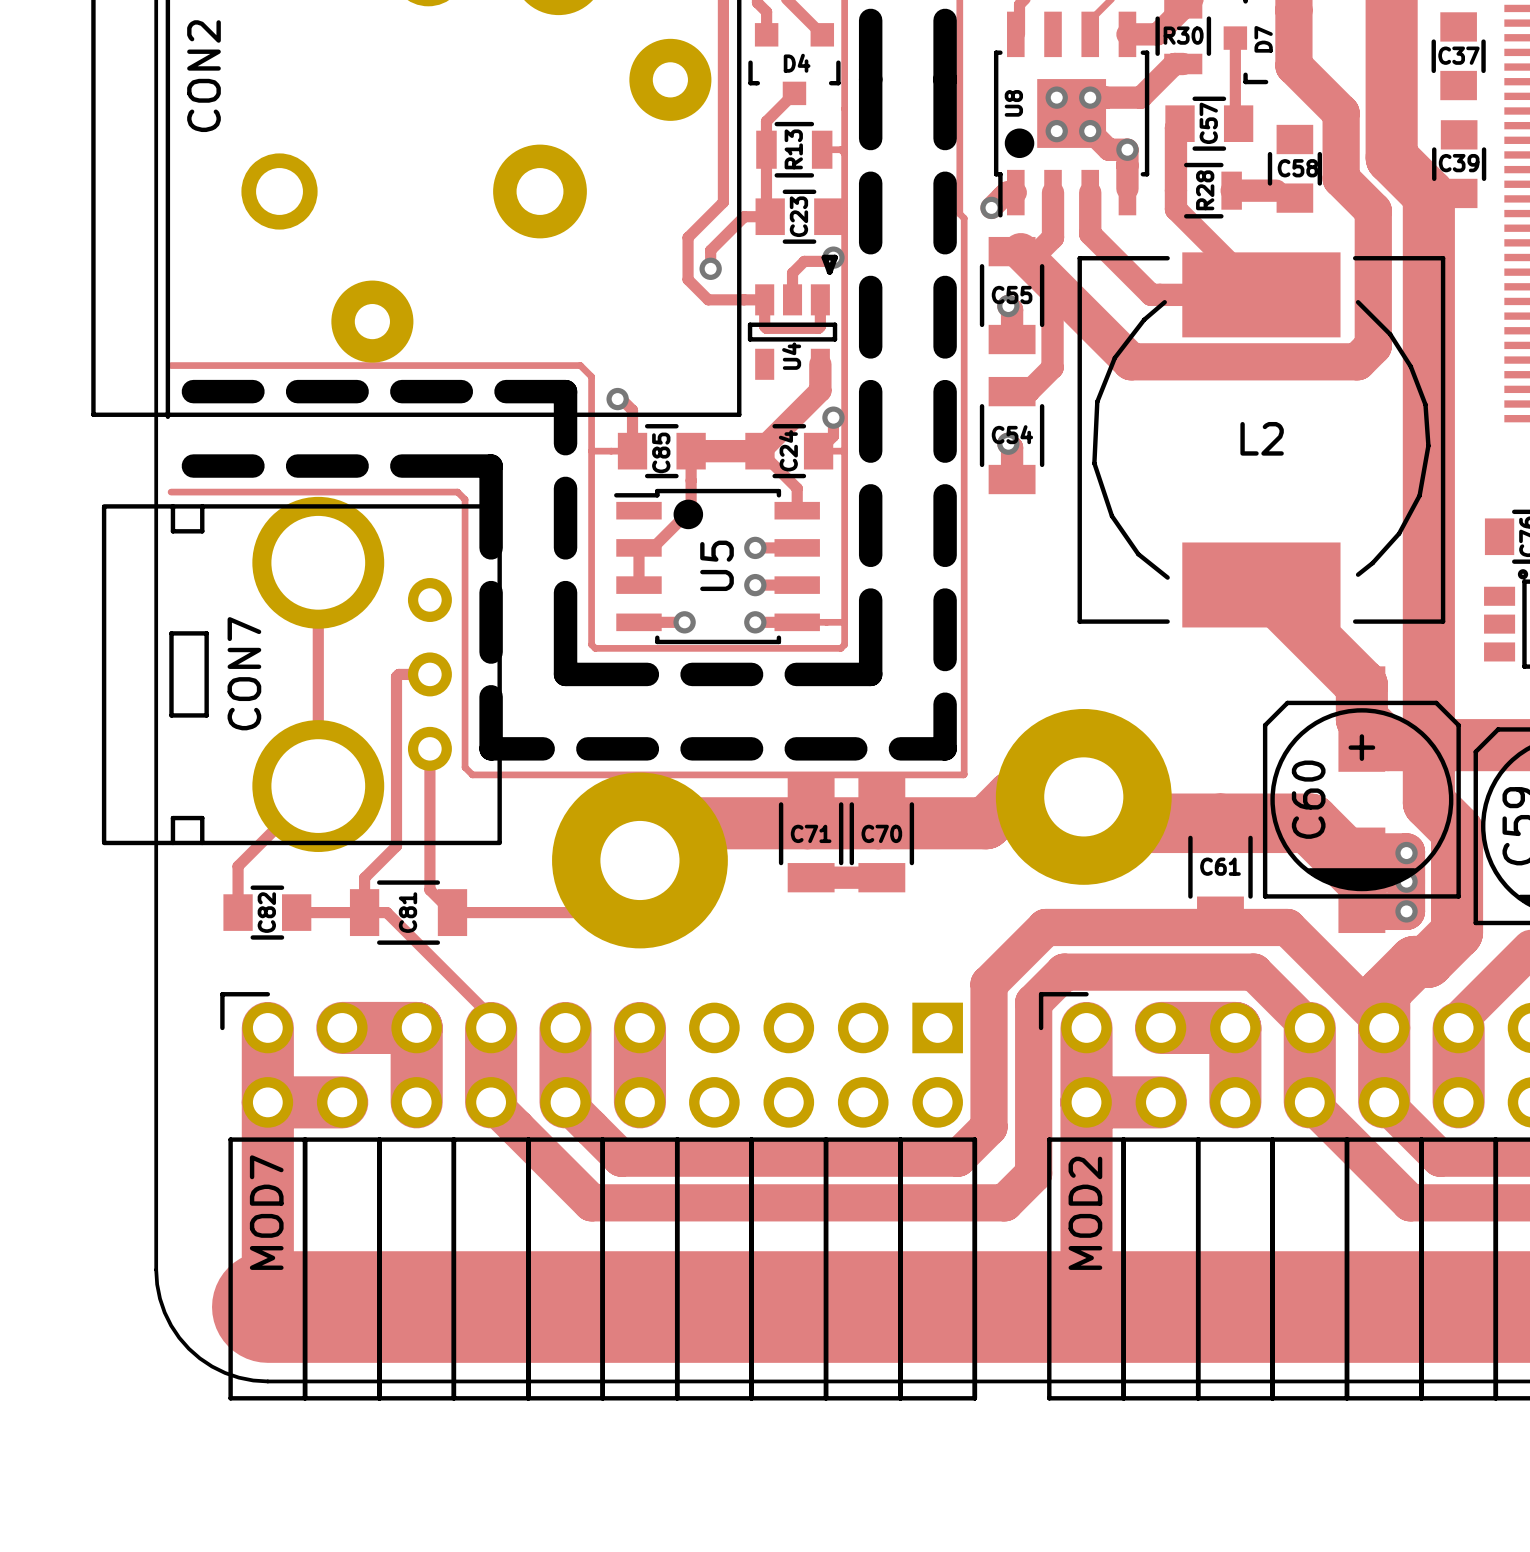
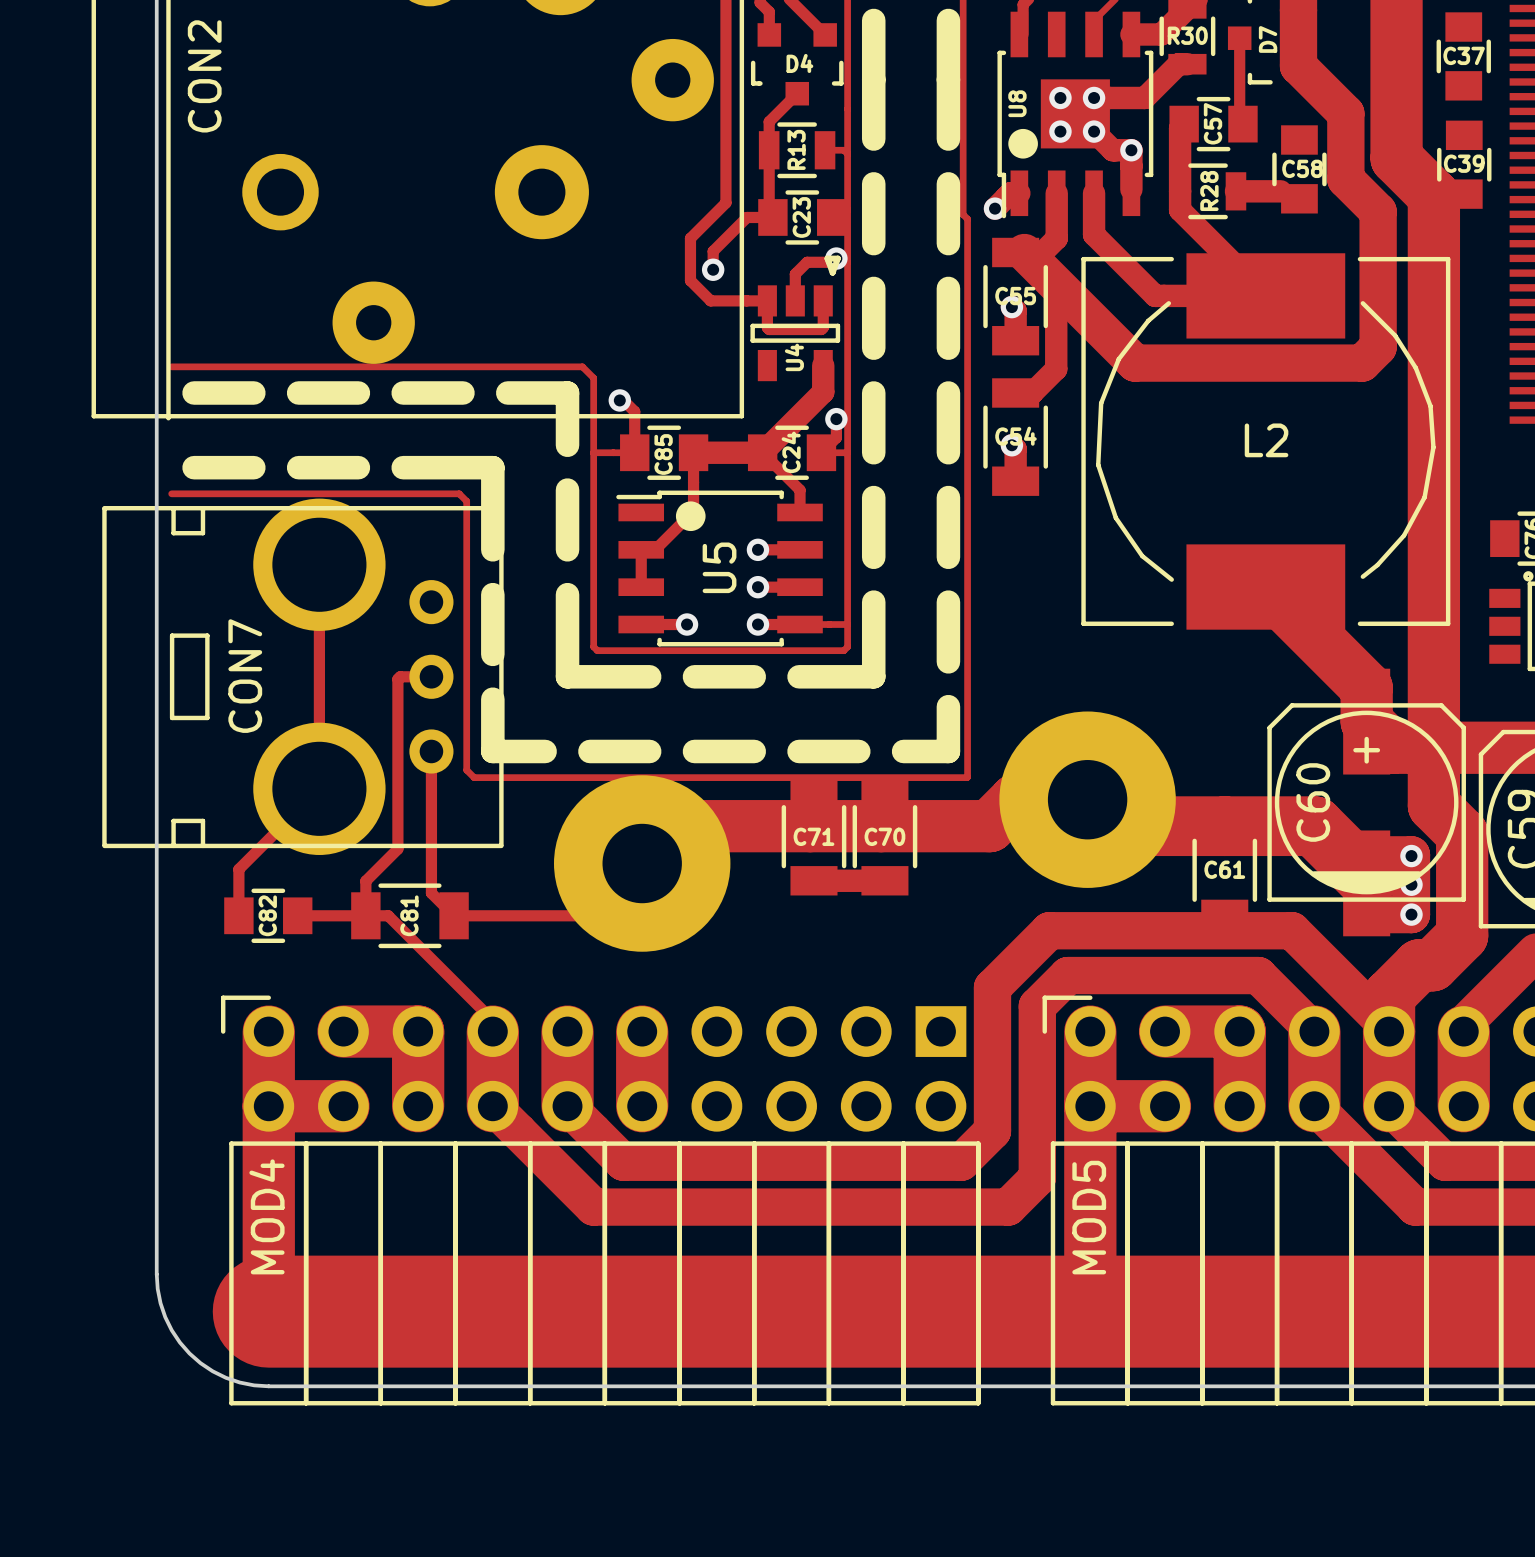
MOD7 name: MOD7 (266, 1212) -> MOD4 (266, 1216)
MOD2 name: MOD2 (1085, 1213) -> MOD5 (1089, 1217)

